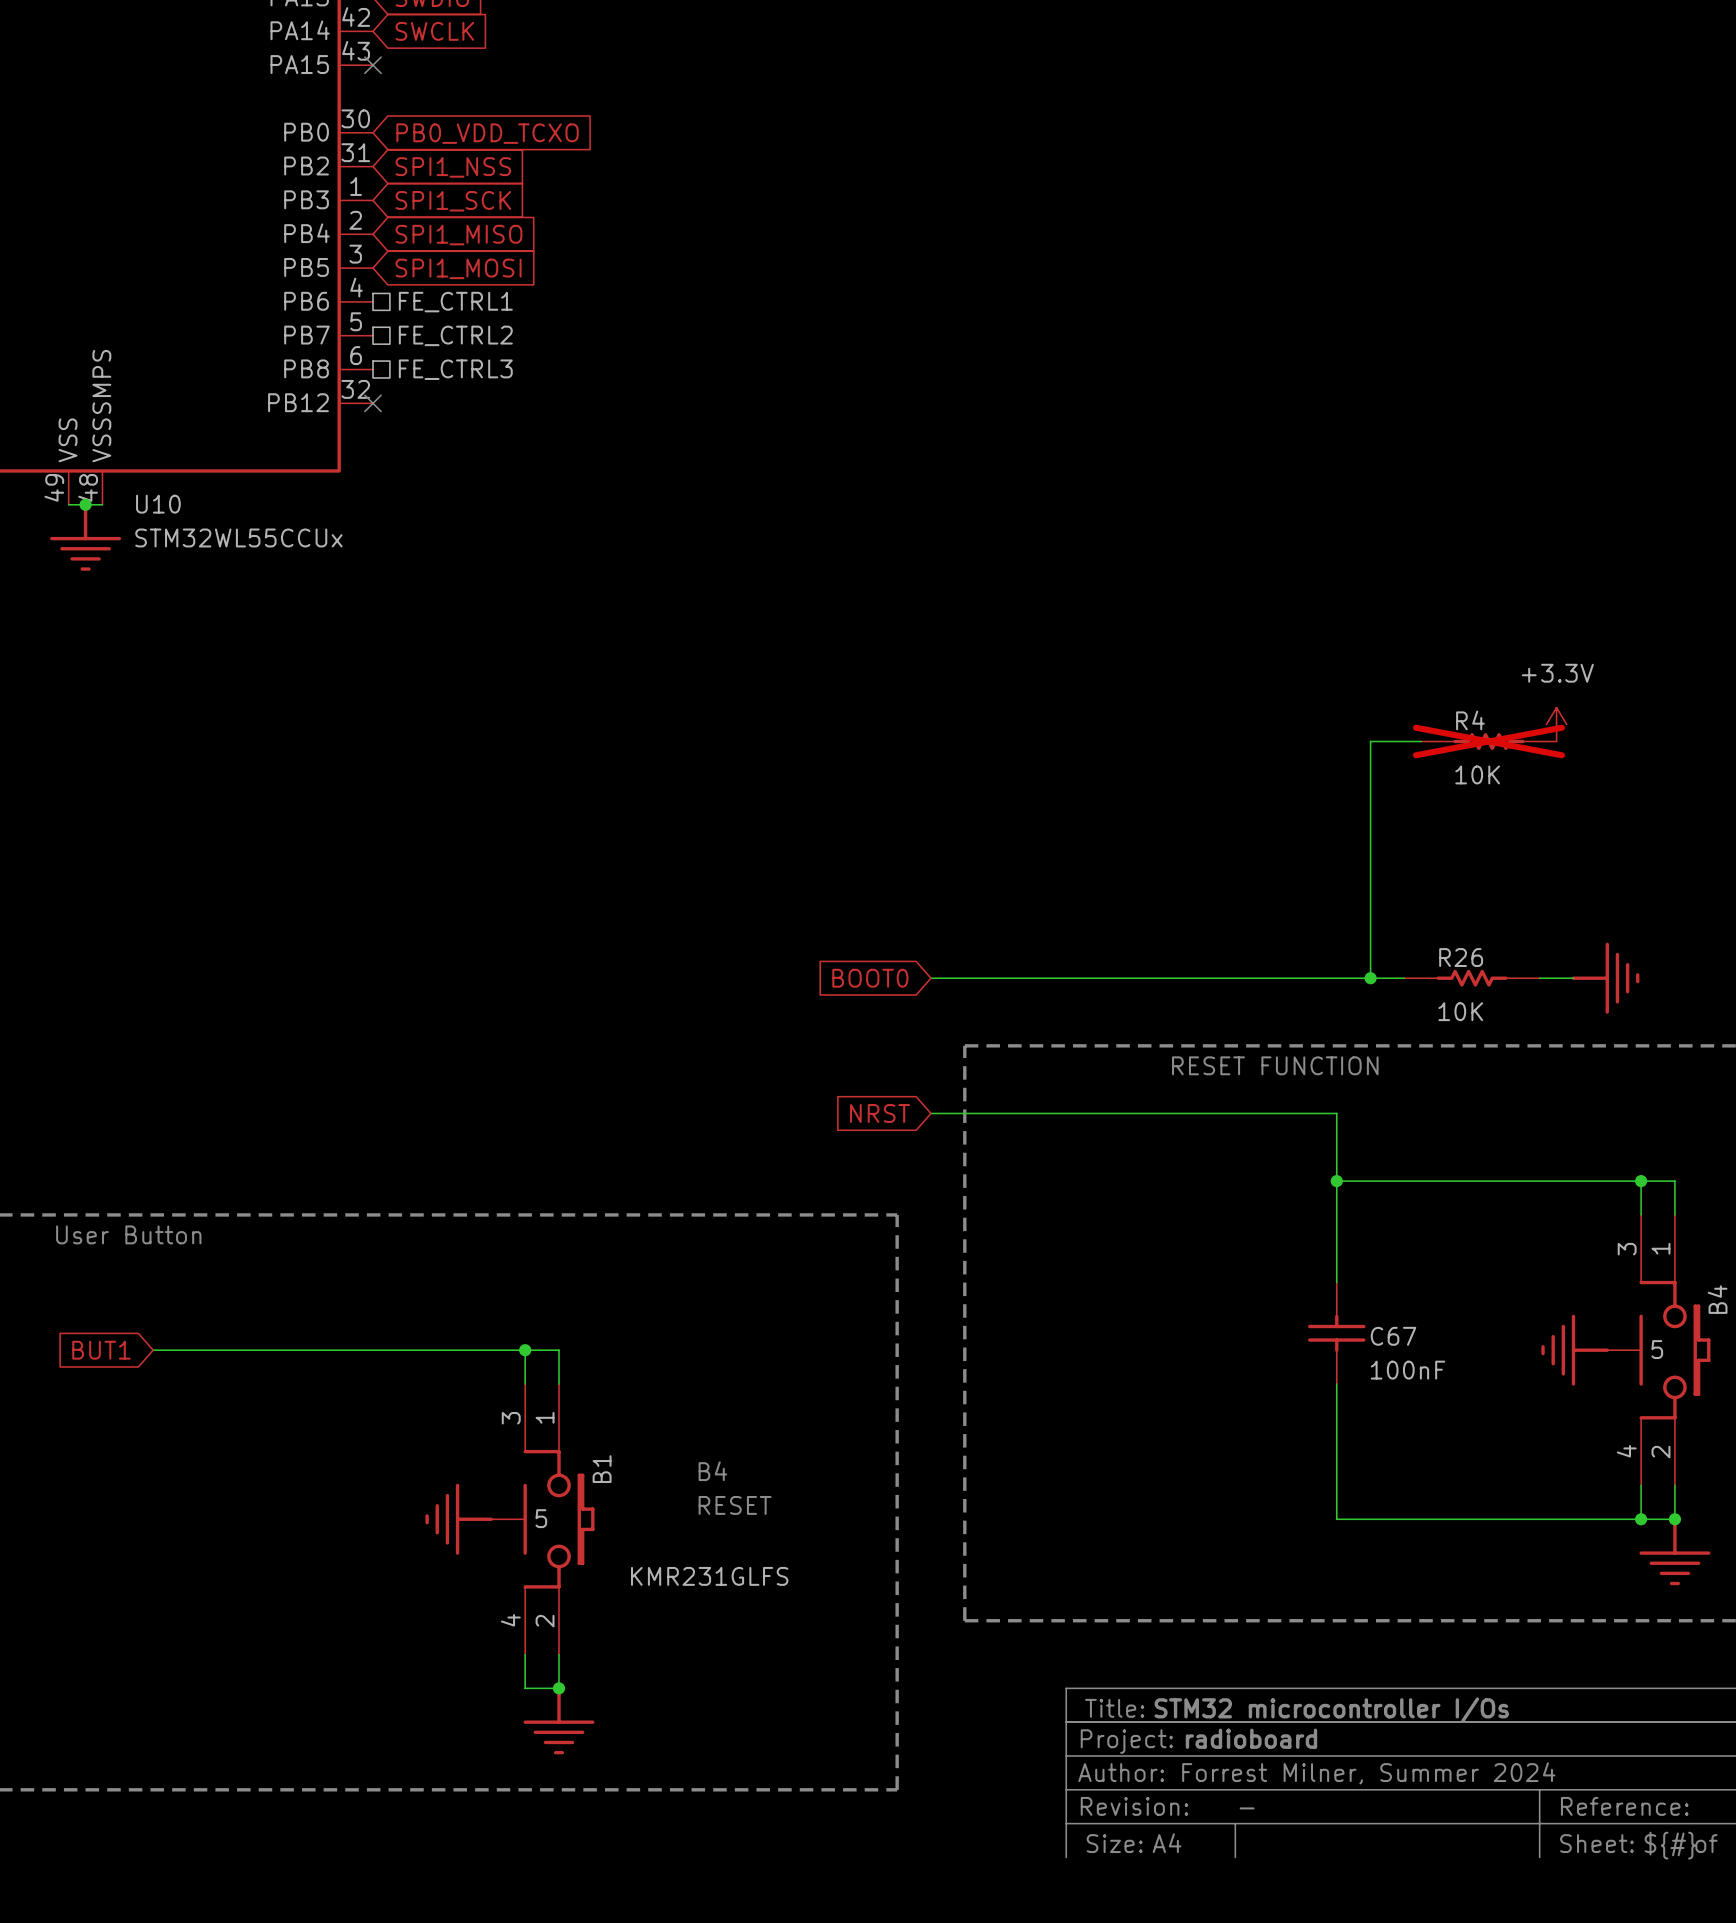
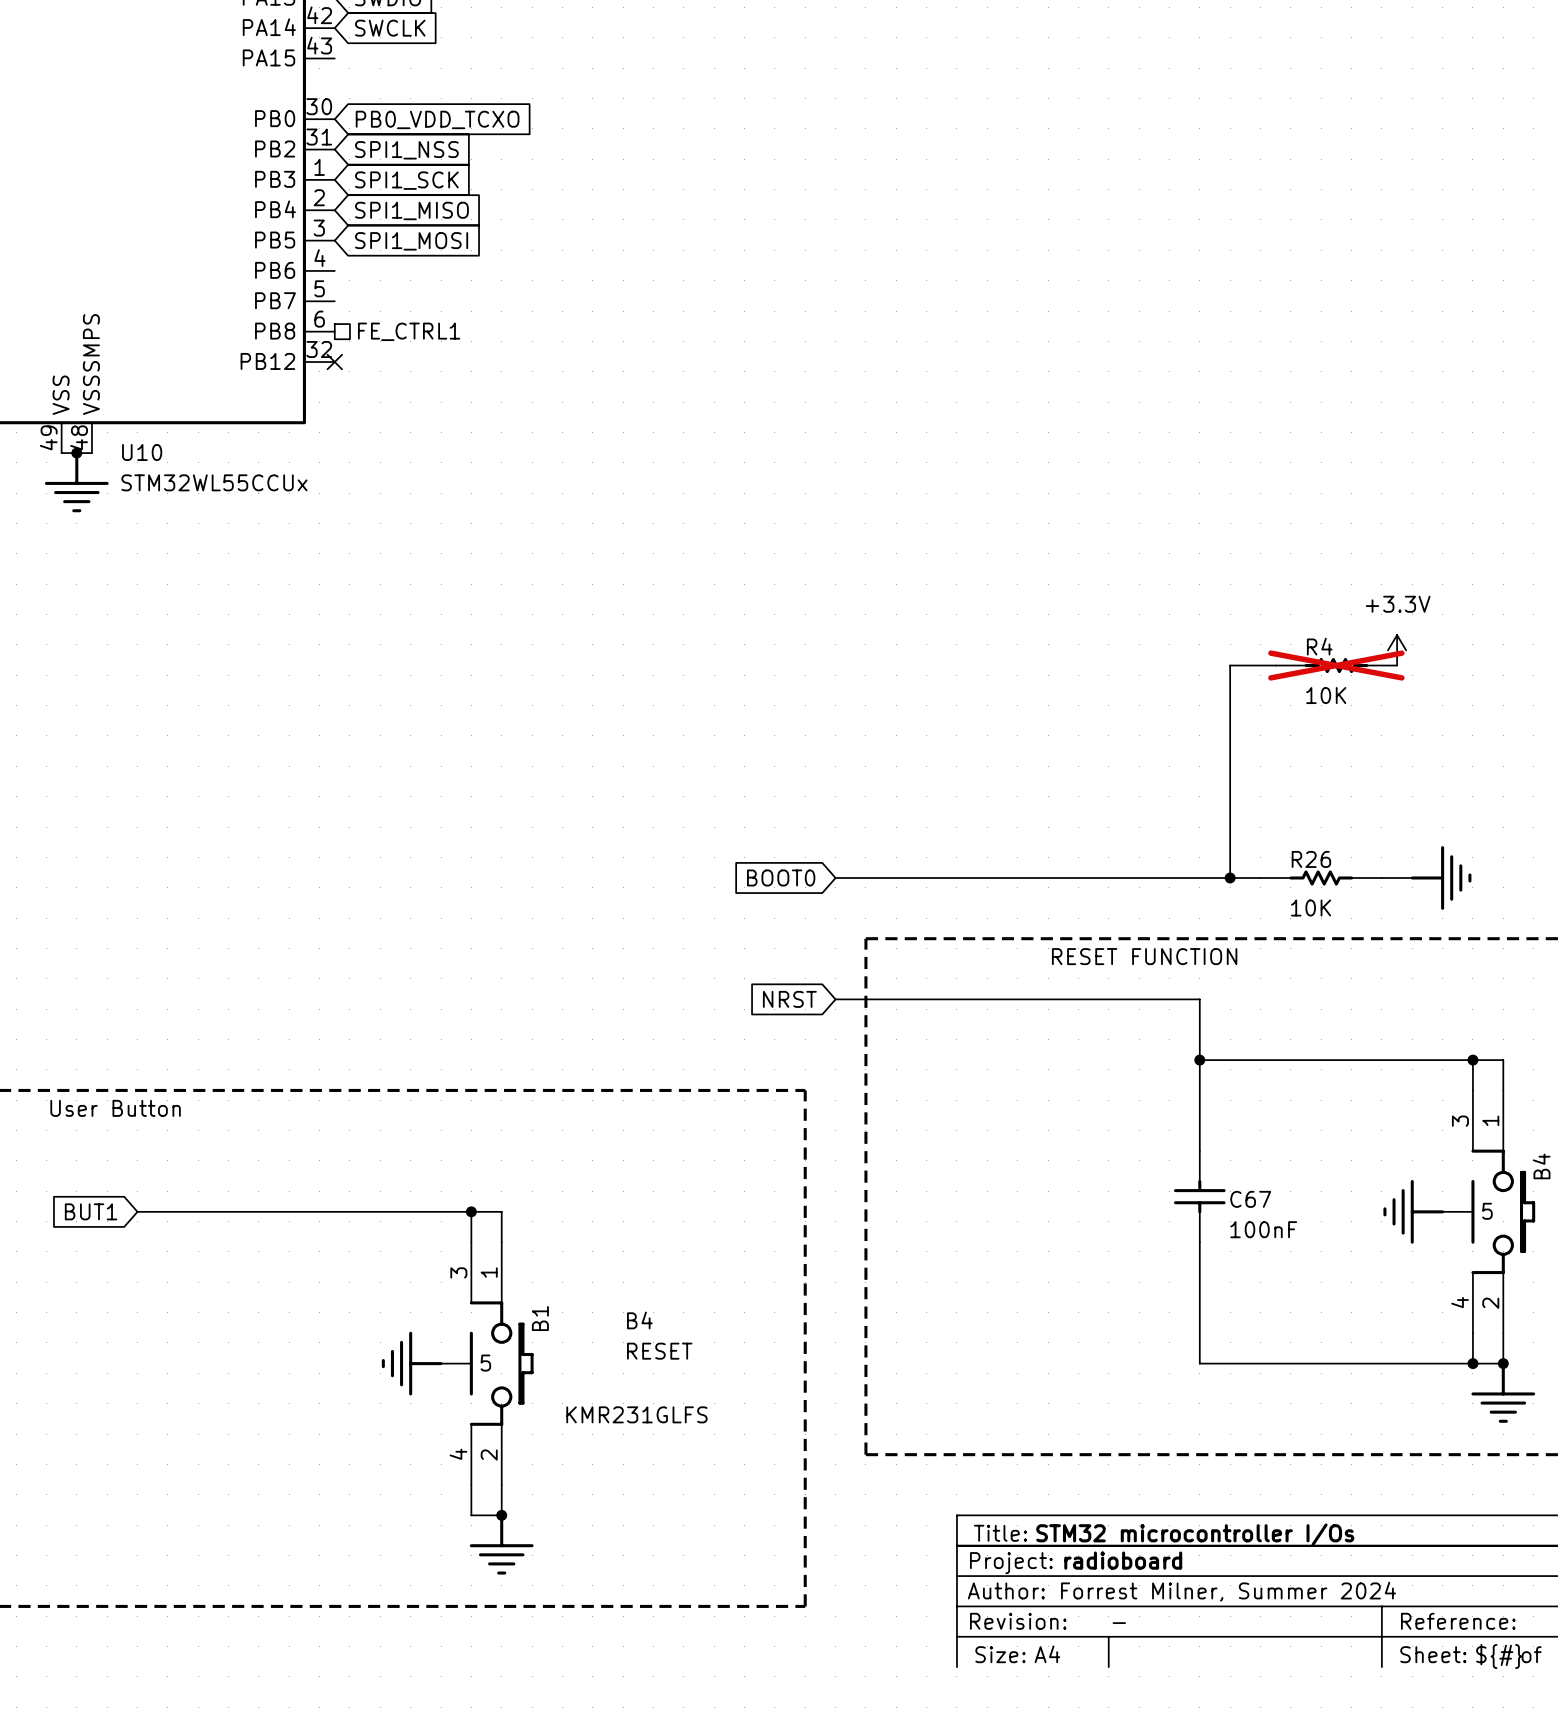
no-connect mark: (373, 65) -> none
hierarchical label: FE_CTRL1 (455, 302) -> none
hierarchical label: FE_CTRL2 (455, 335) -> none
hierarchical label: FE_CTRL3 (455, 369) -> FE_CTRL1 (409, 331)

